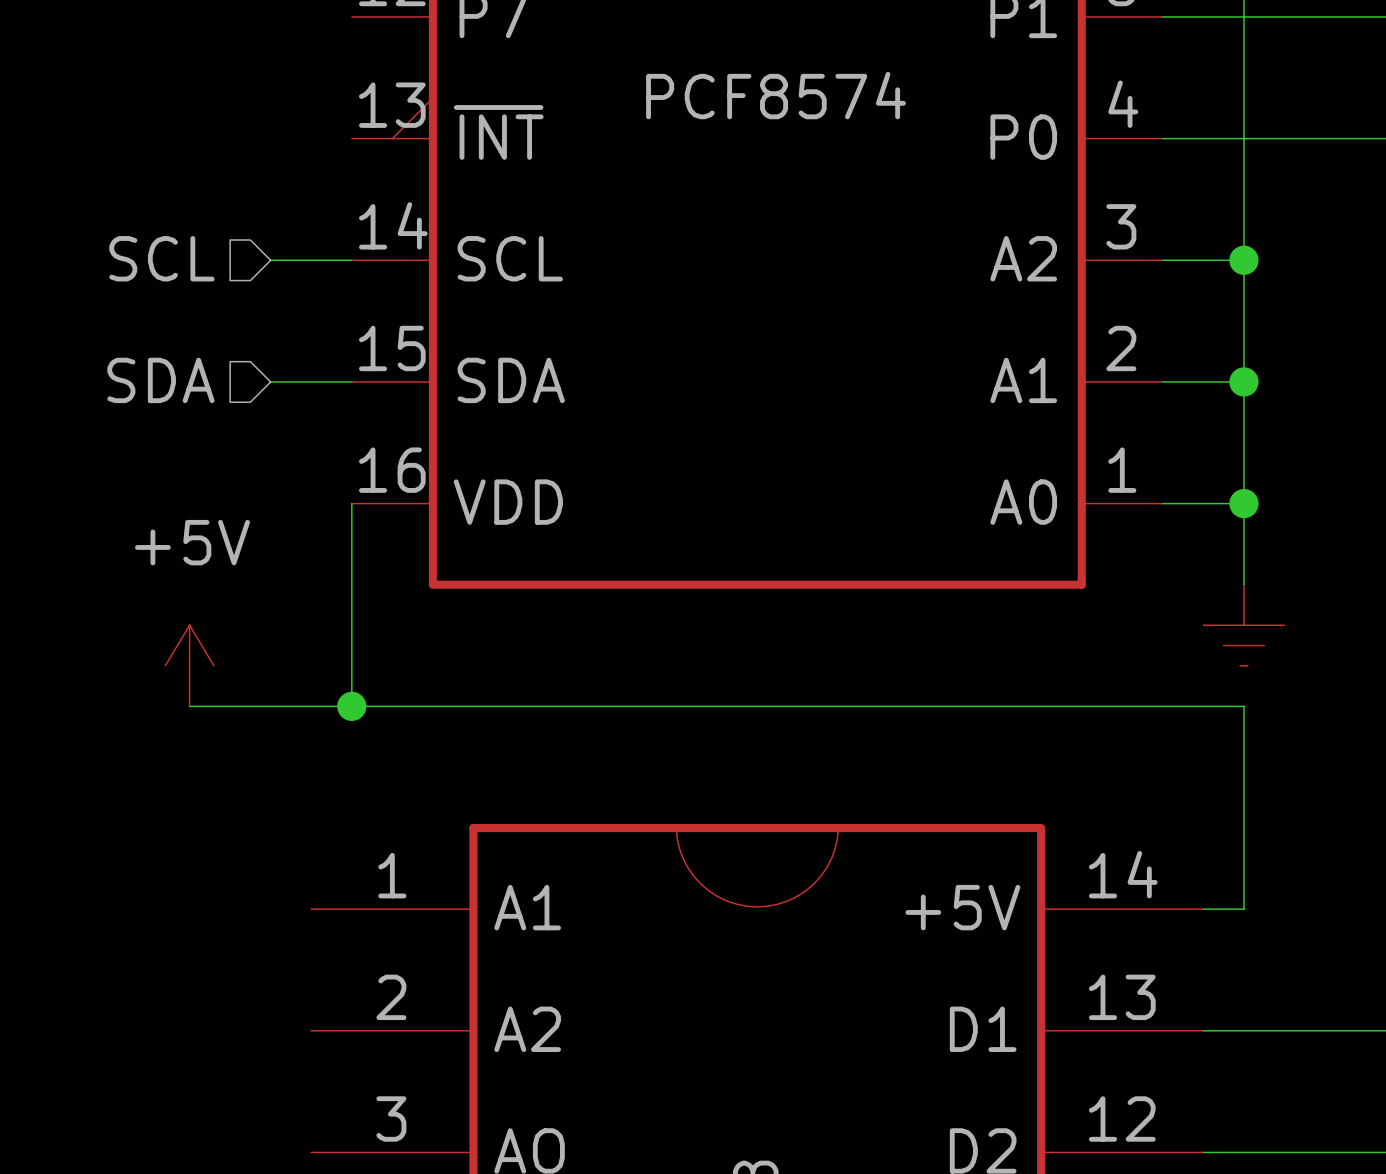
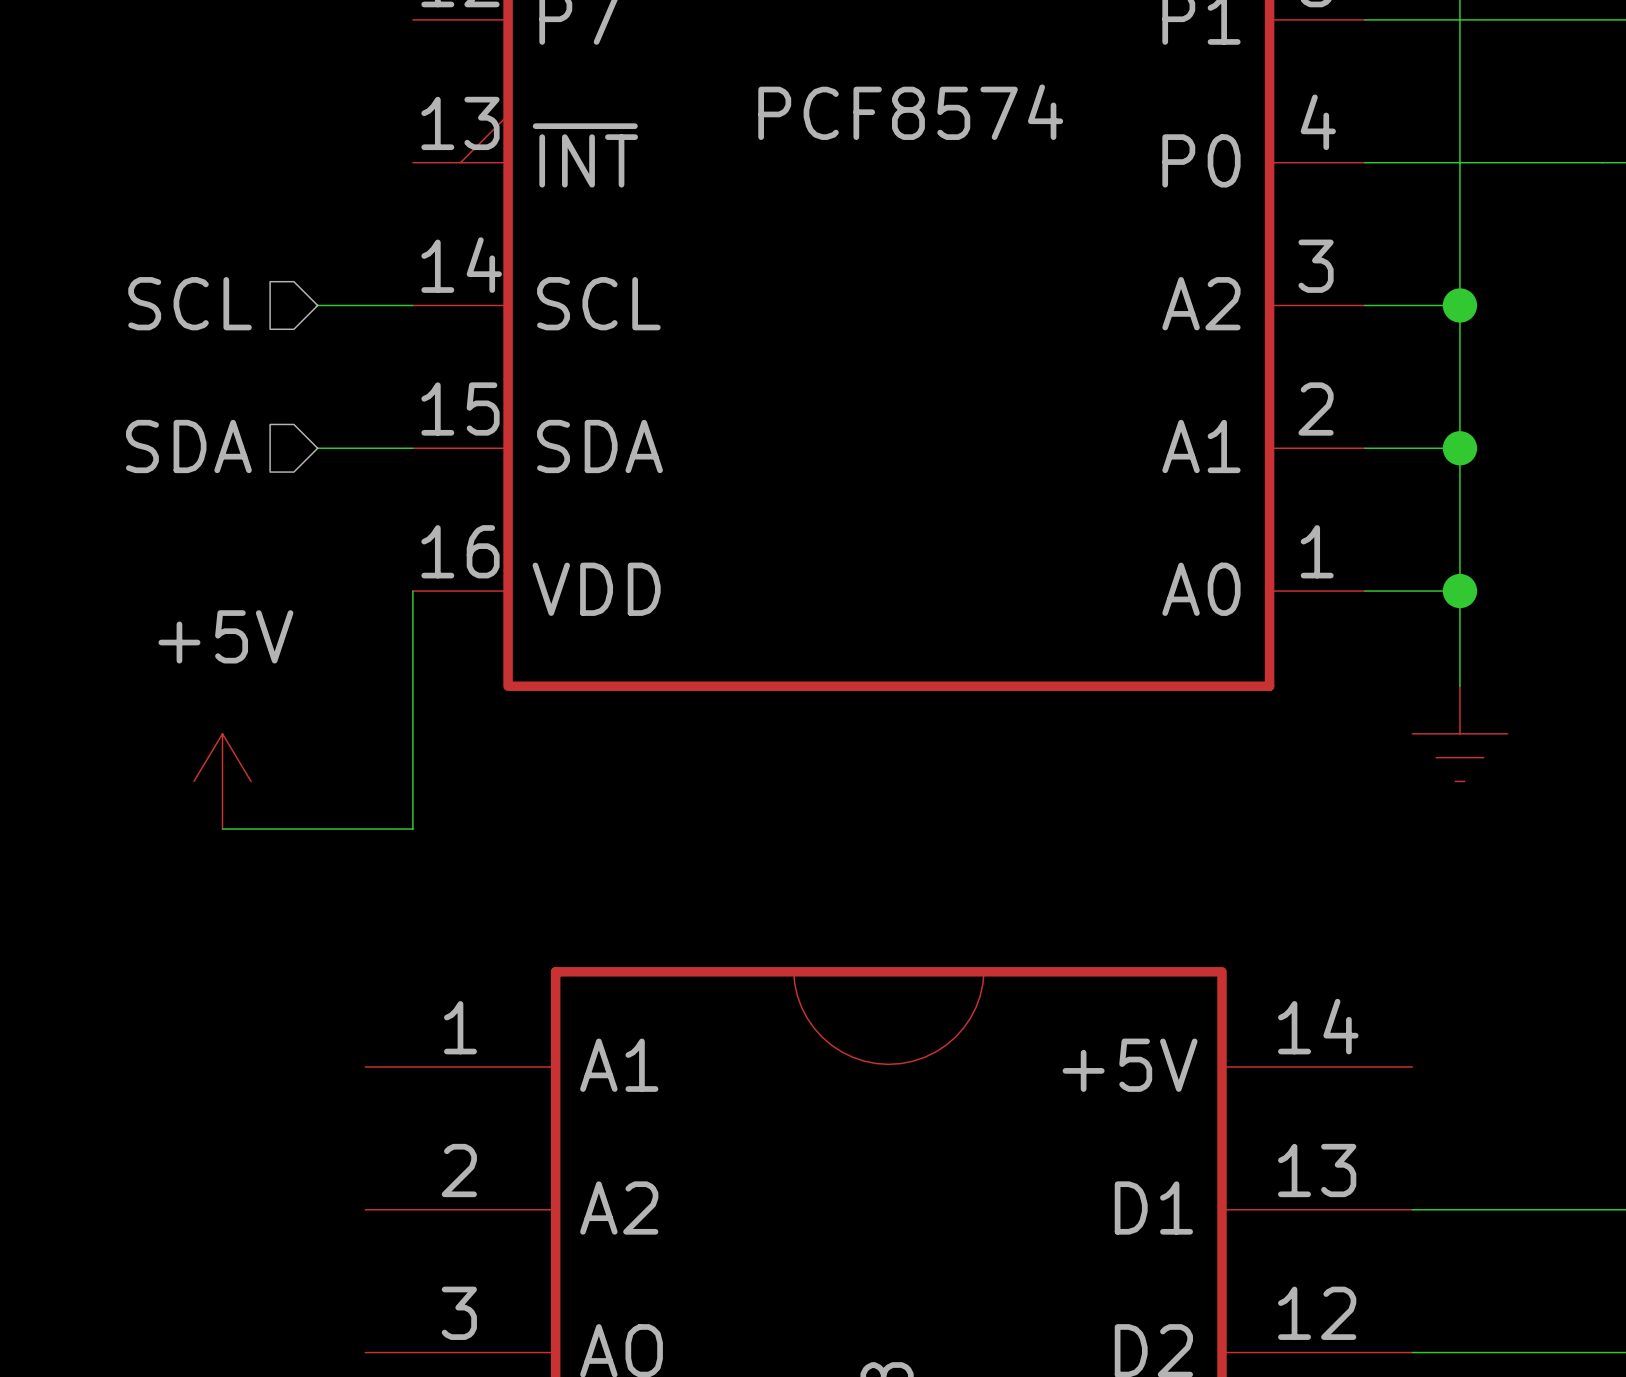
wire: (351, 706) (1243, 706) (1243, 909) (1203, 909) -> none
junction: (351, 706) -> none

